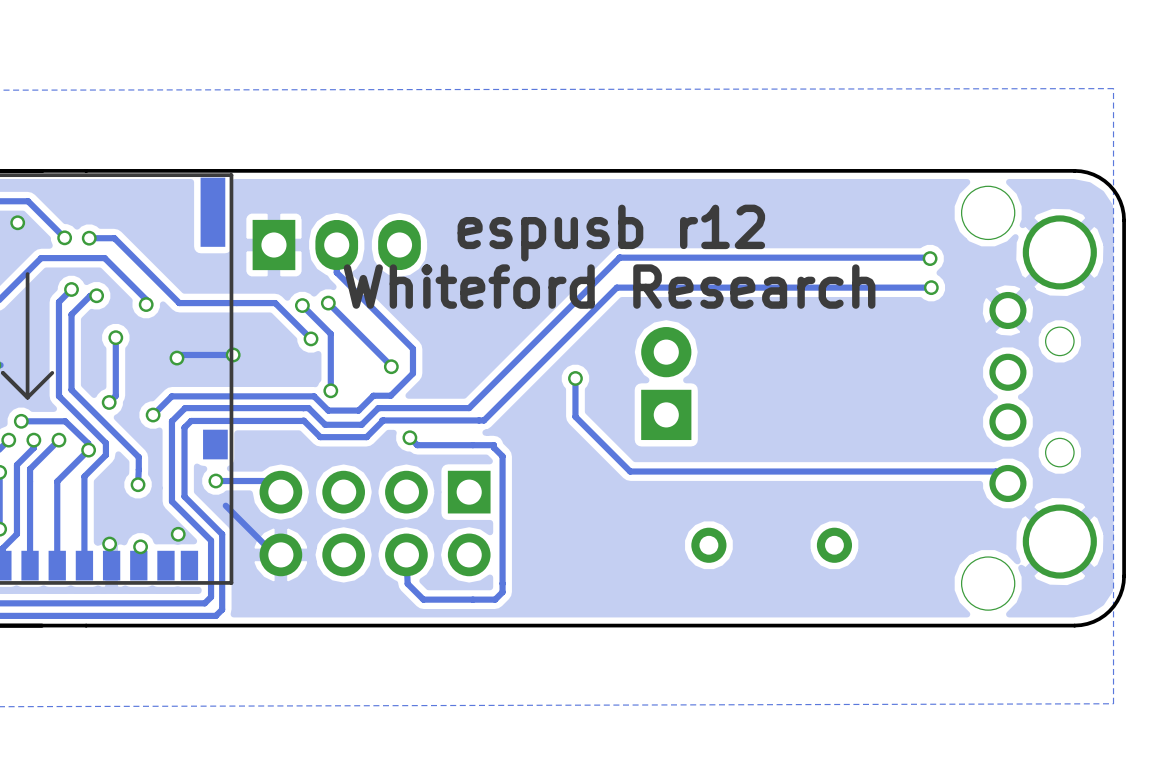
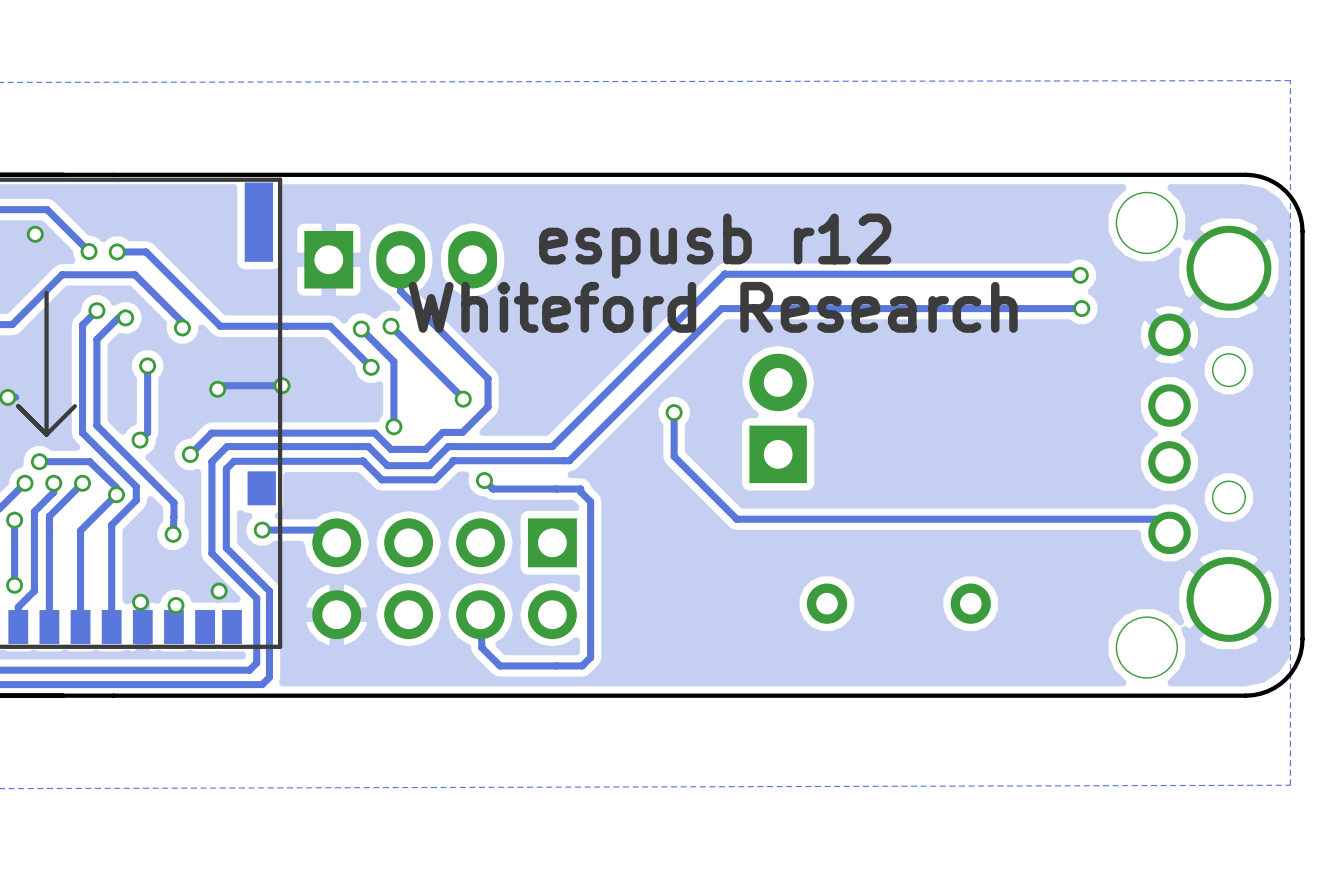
track: (225, 505) (274, 554) (280, 554) -> none

